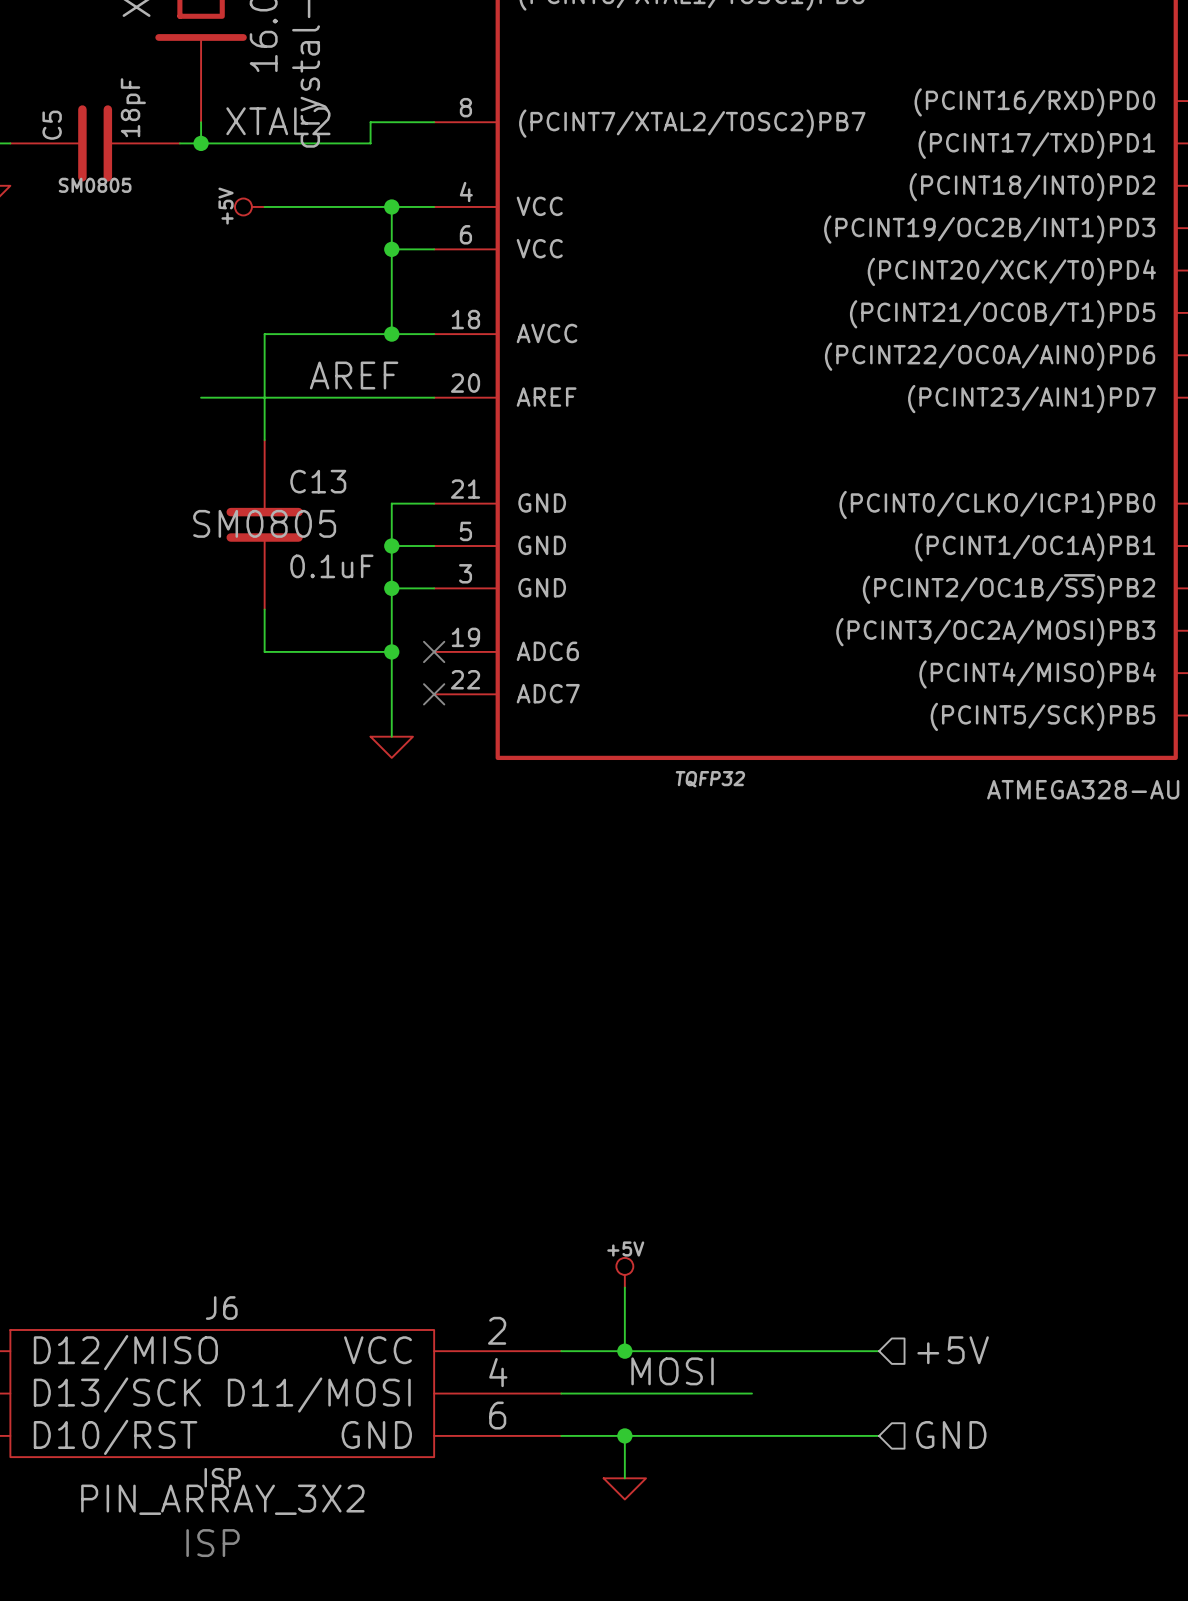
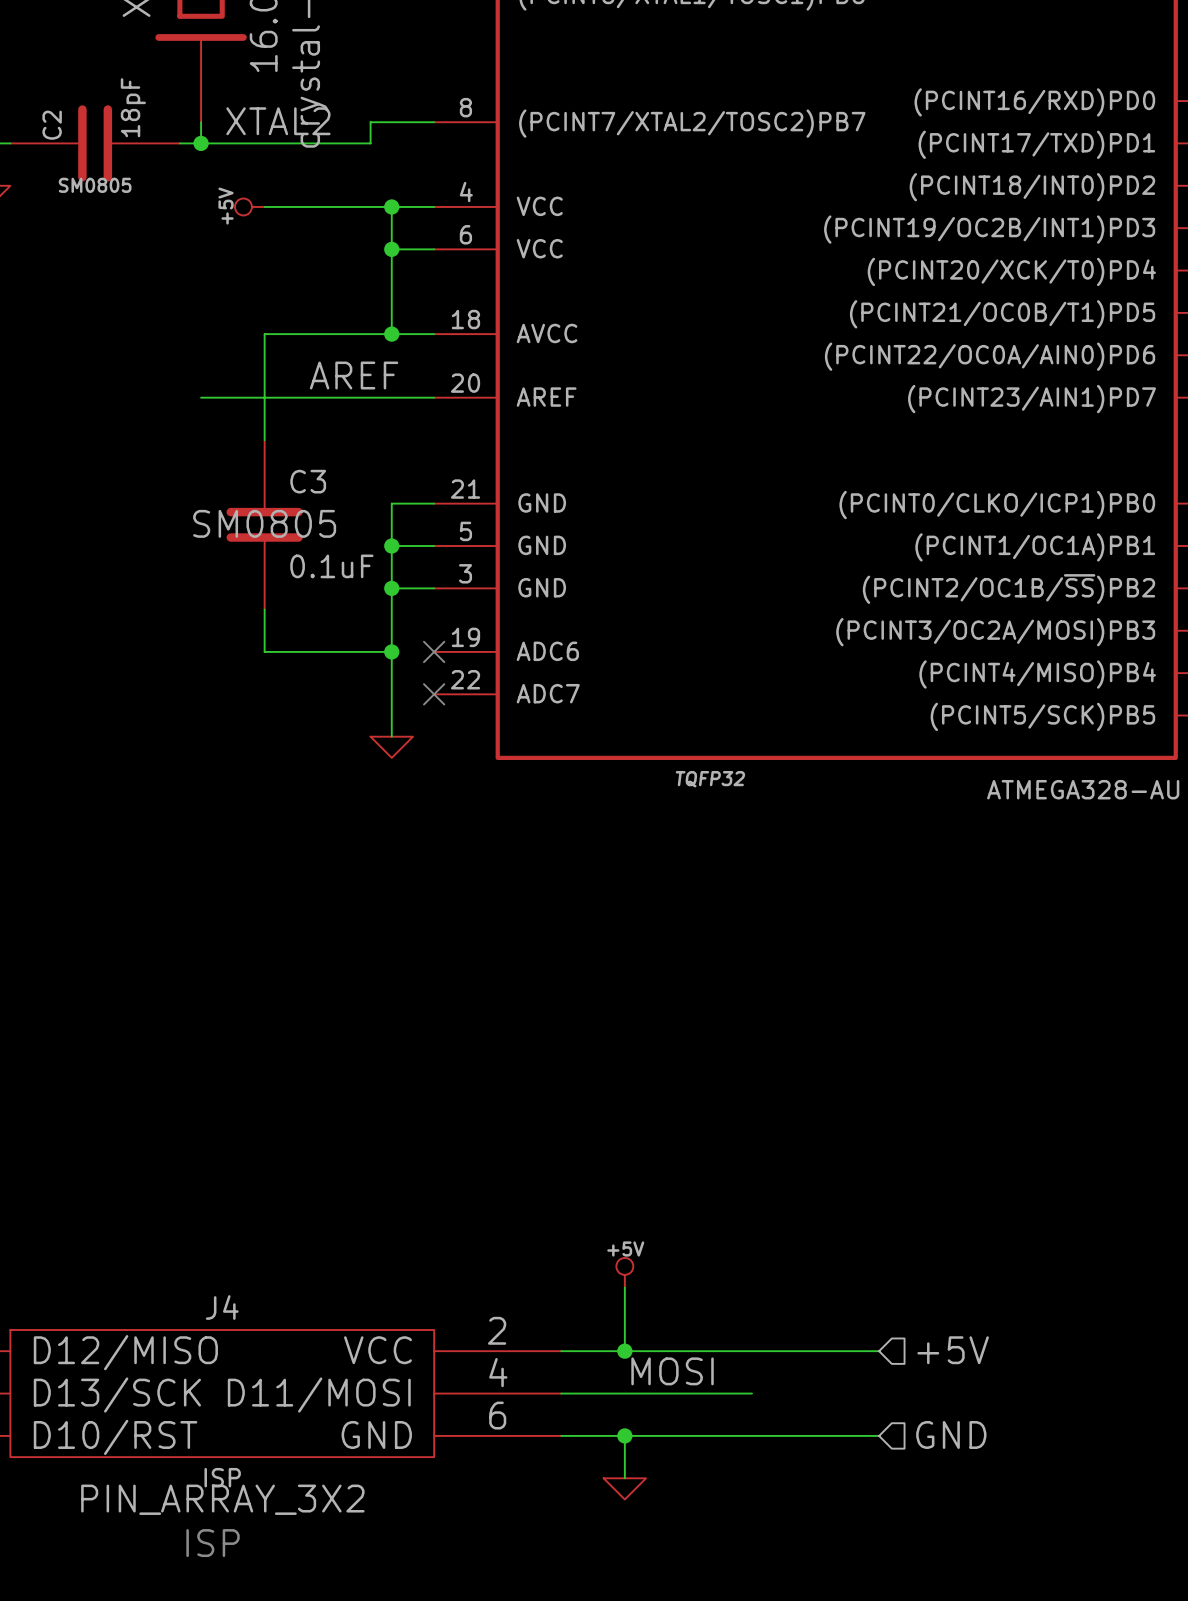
C5 name: C5 (52, 125) -> C2 (52, 125)
C13 name: C13 (318, 481) -> C3 (308, 481)
J6 name: J6 (221, 1308) -> J4 (222, 1307)

